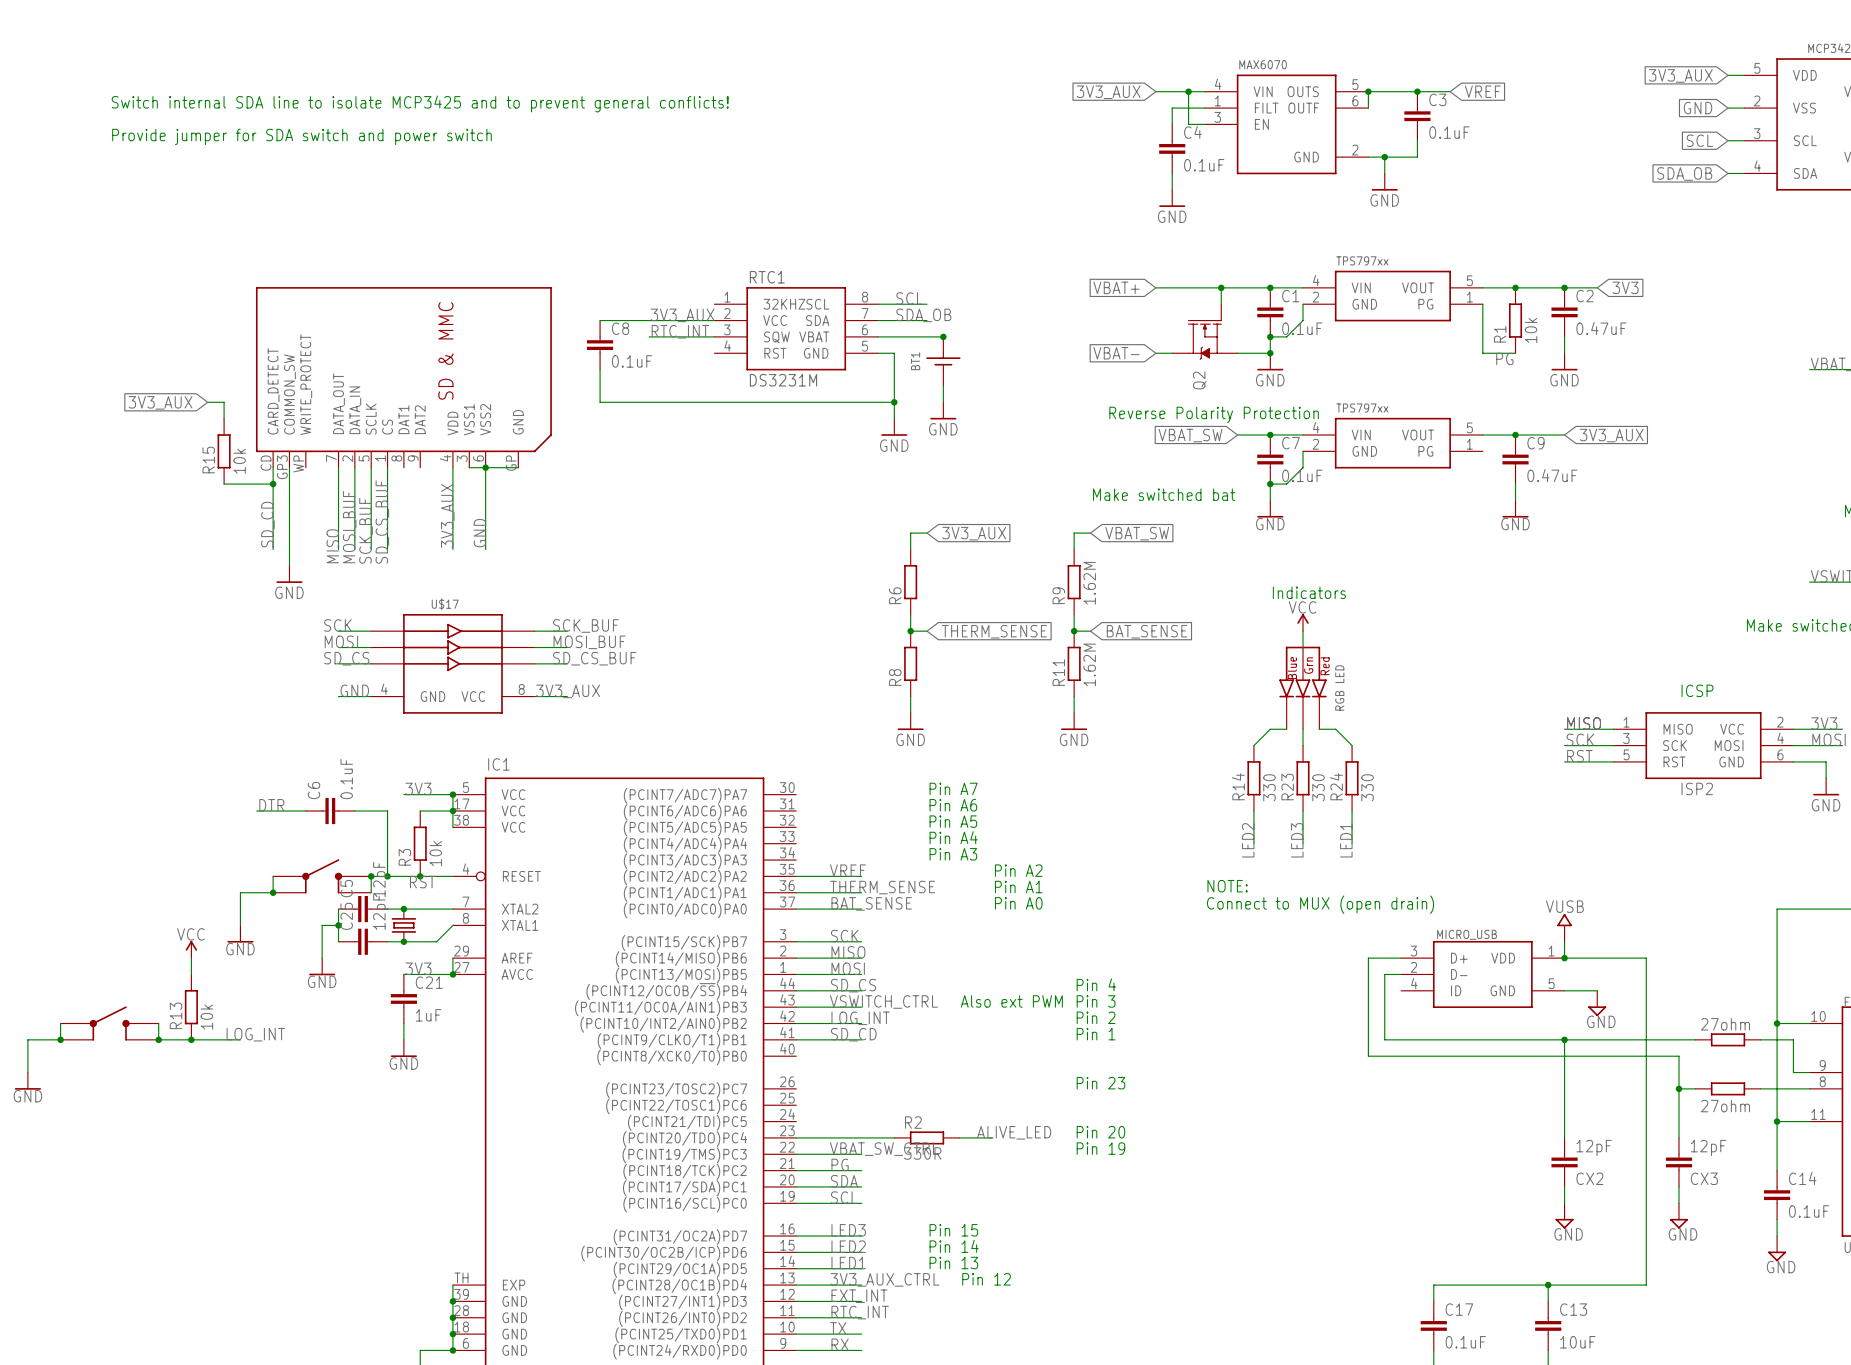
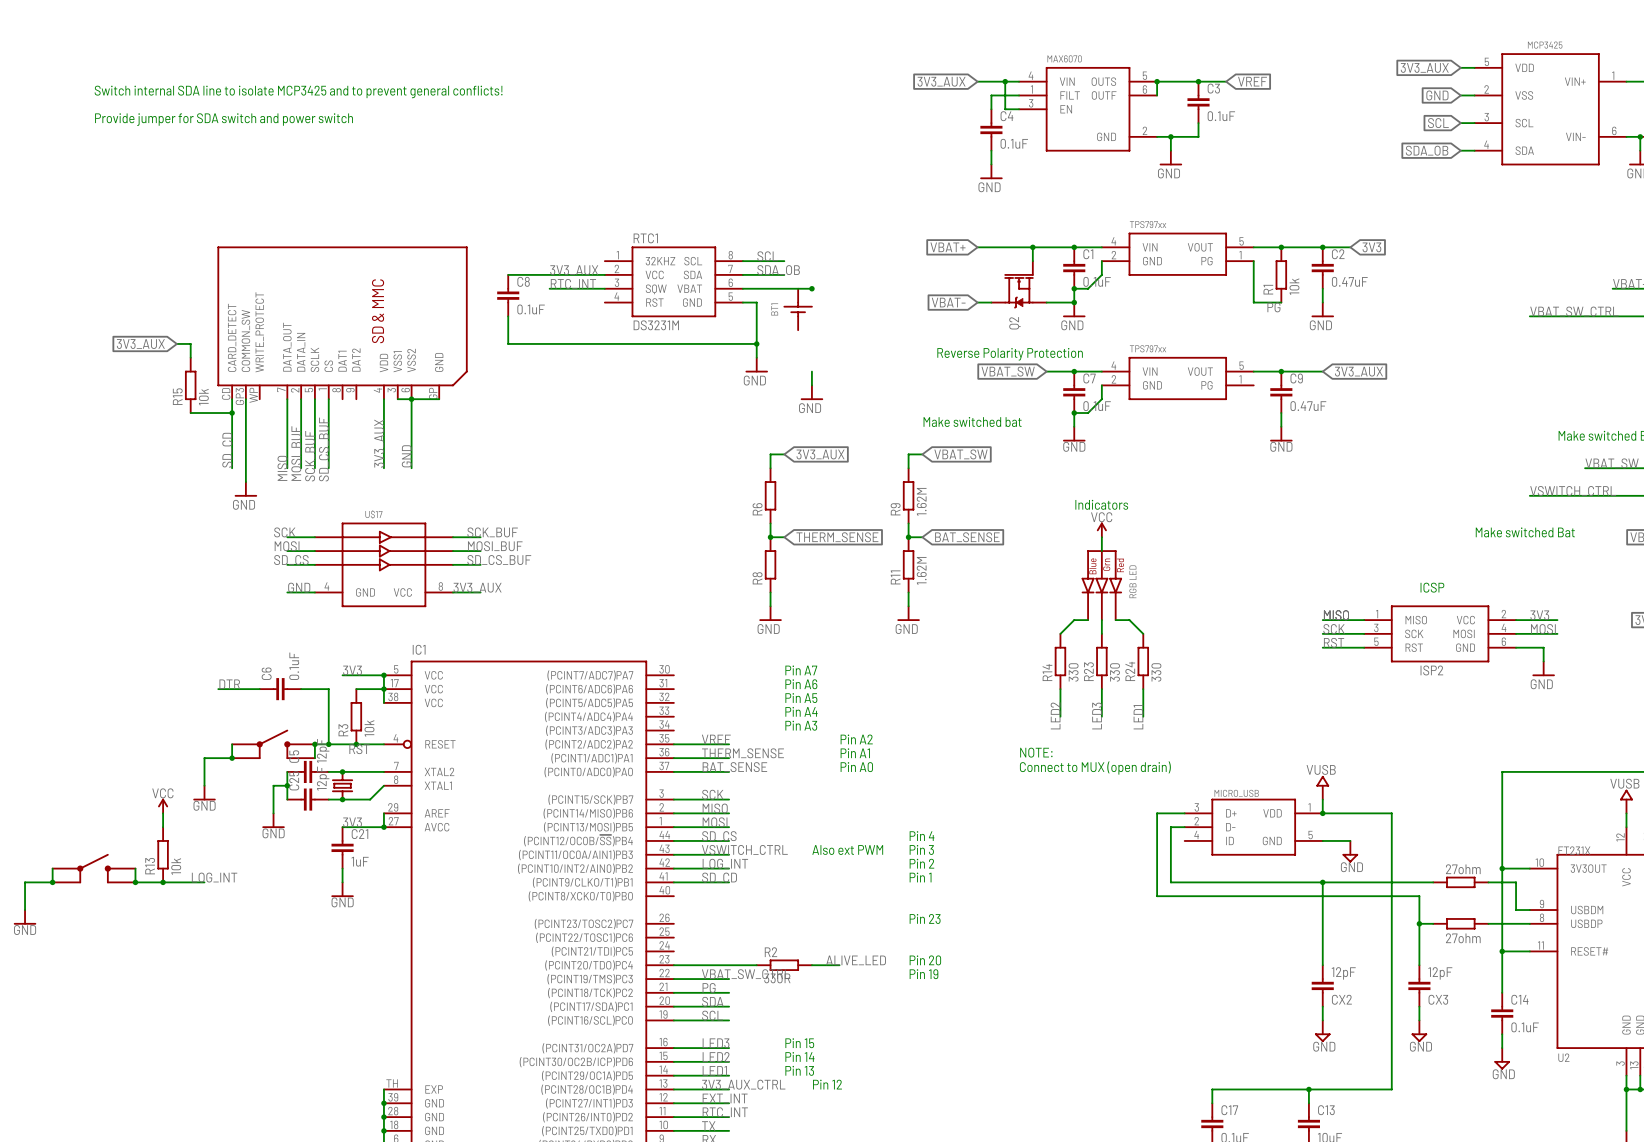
wire: none -> (798, 288) (811, 288)
junction position: (943, 336) -> (811, 288)
wire: (943, 385) (943, 402) -> (811, 371) (811, 385)
power symbol position: GND (943, 410) -> GND (811, 392)

